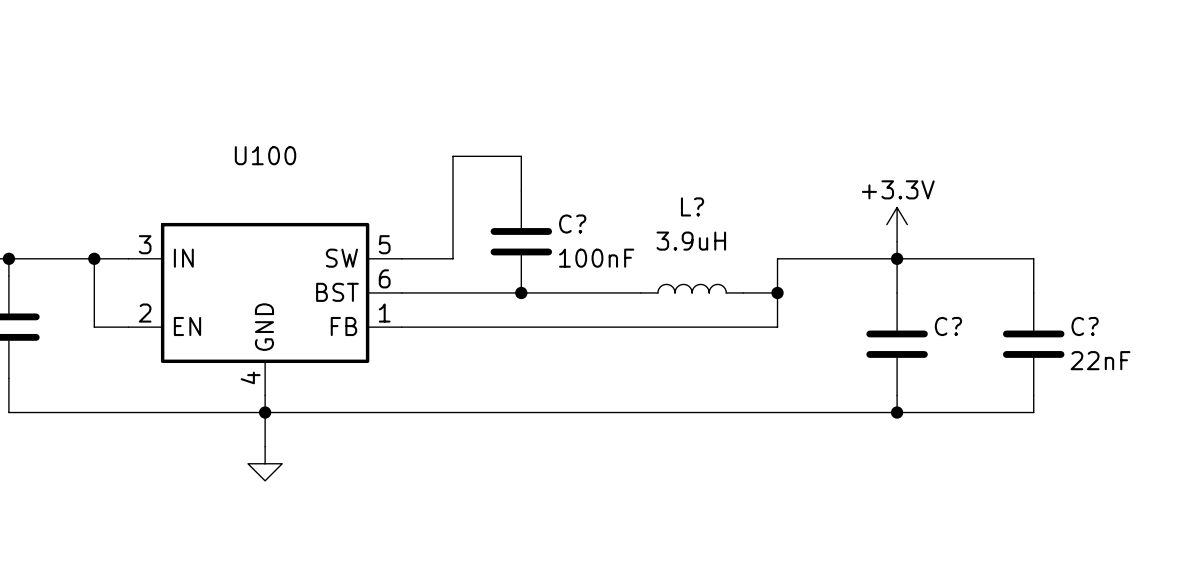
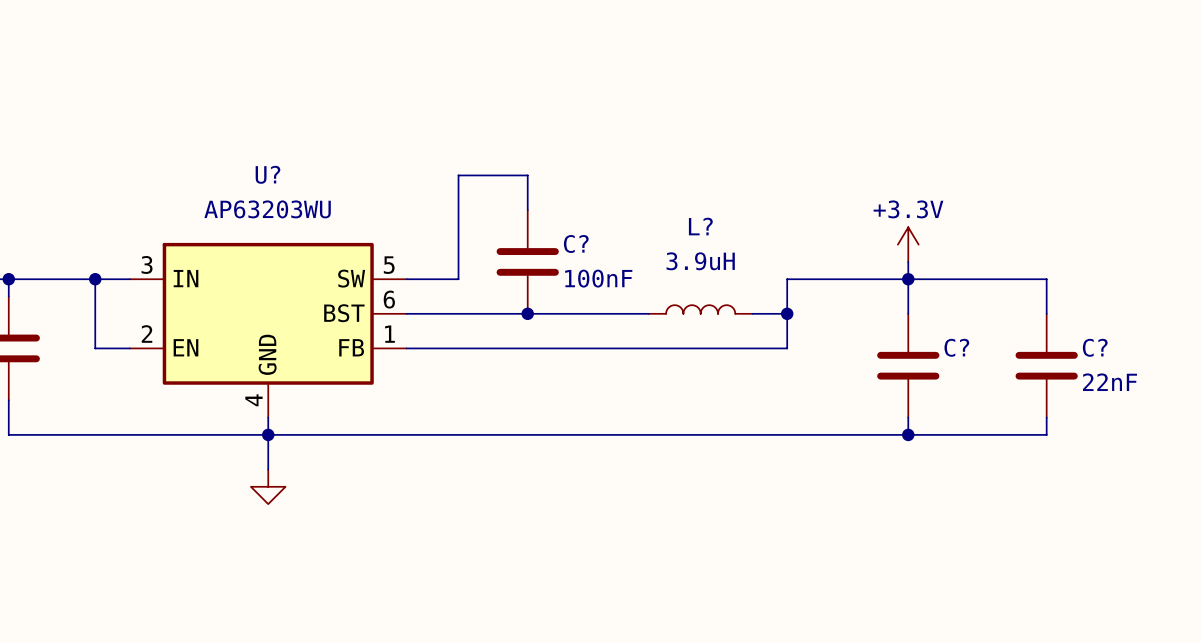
U100 name: U100 (265, 155) -> U? (267, 174)
U100 value: none -> AP63203WU (267, 209)

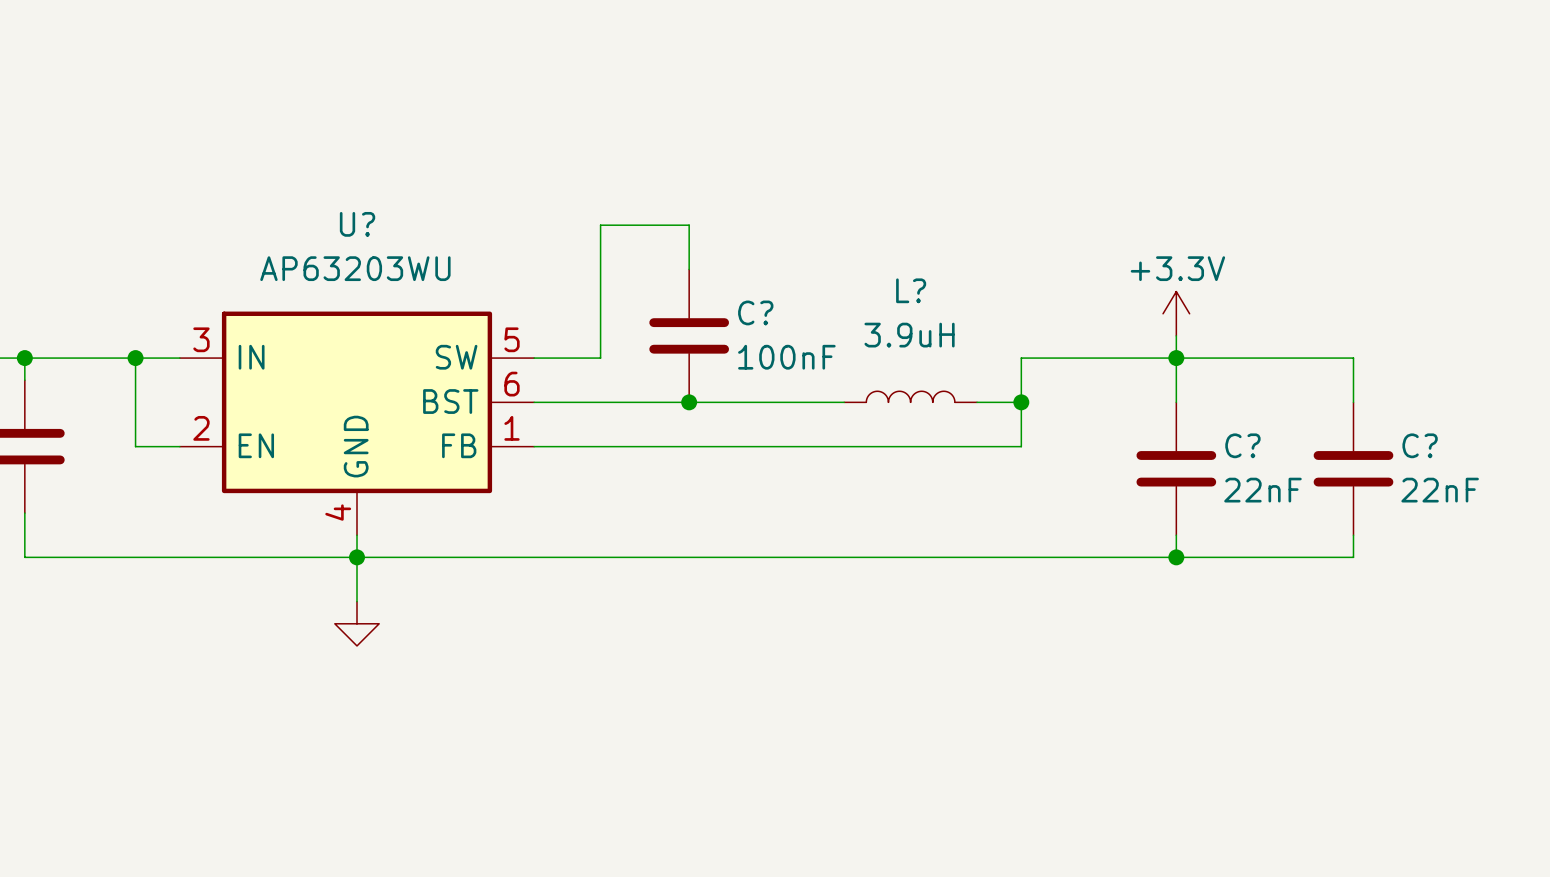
C? value: none -> 22nF (1262, 490)

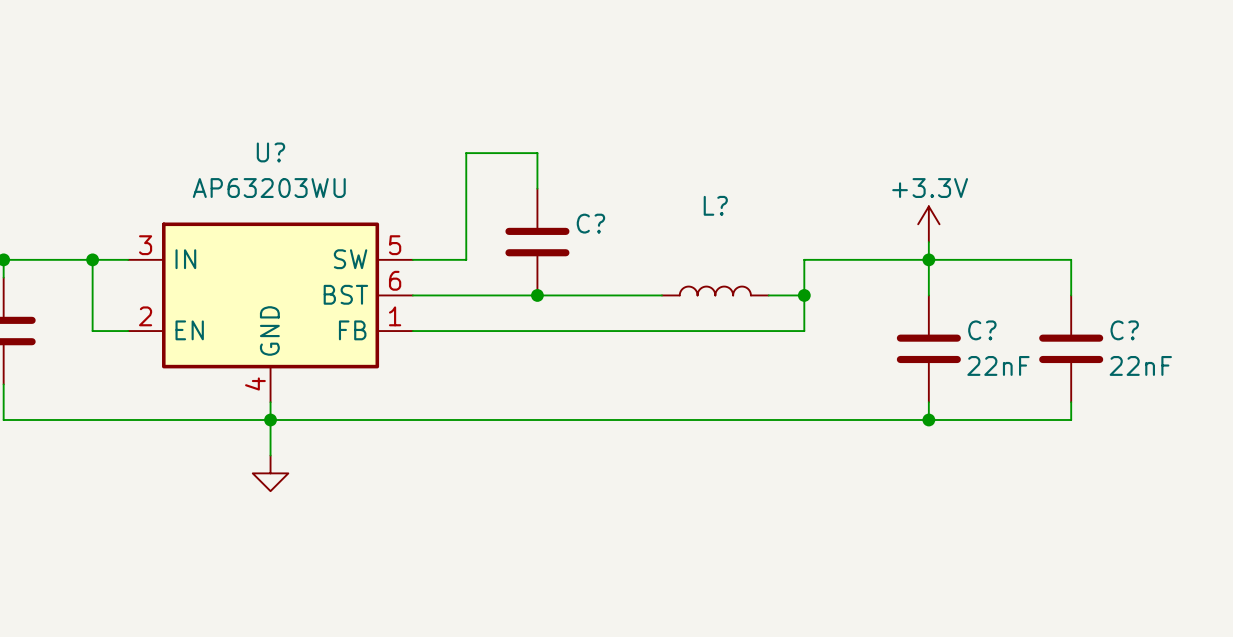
L? value: 3.9uH (909, 335) -> none
C? value: 100nF (786, 357) -> none

